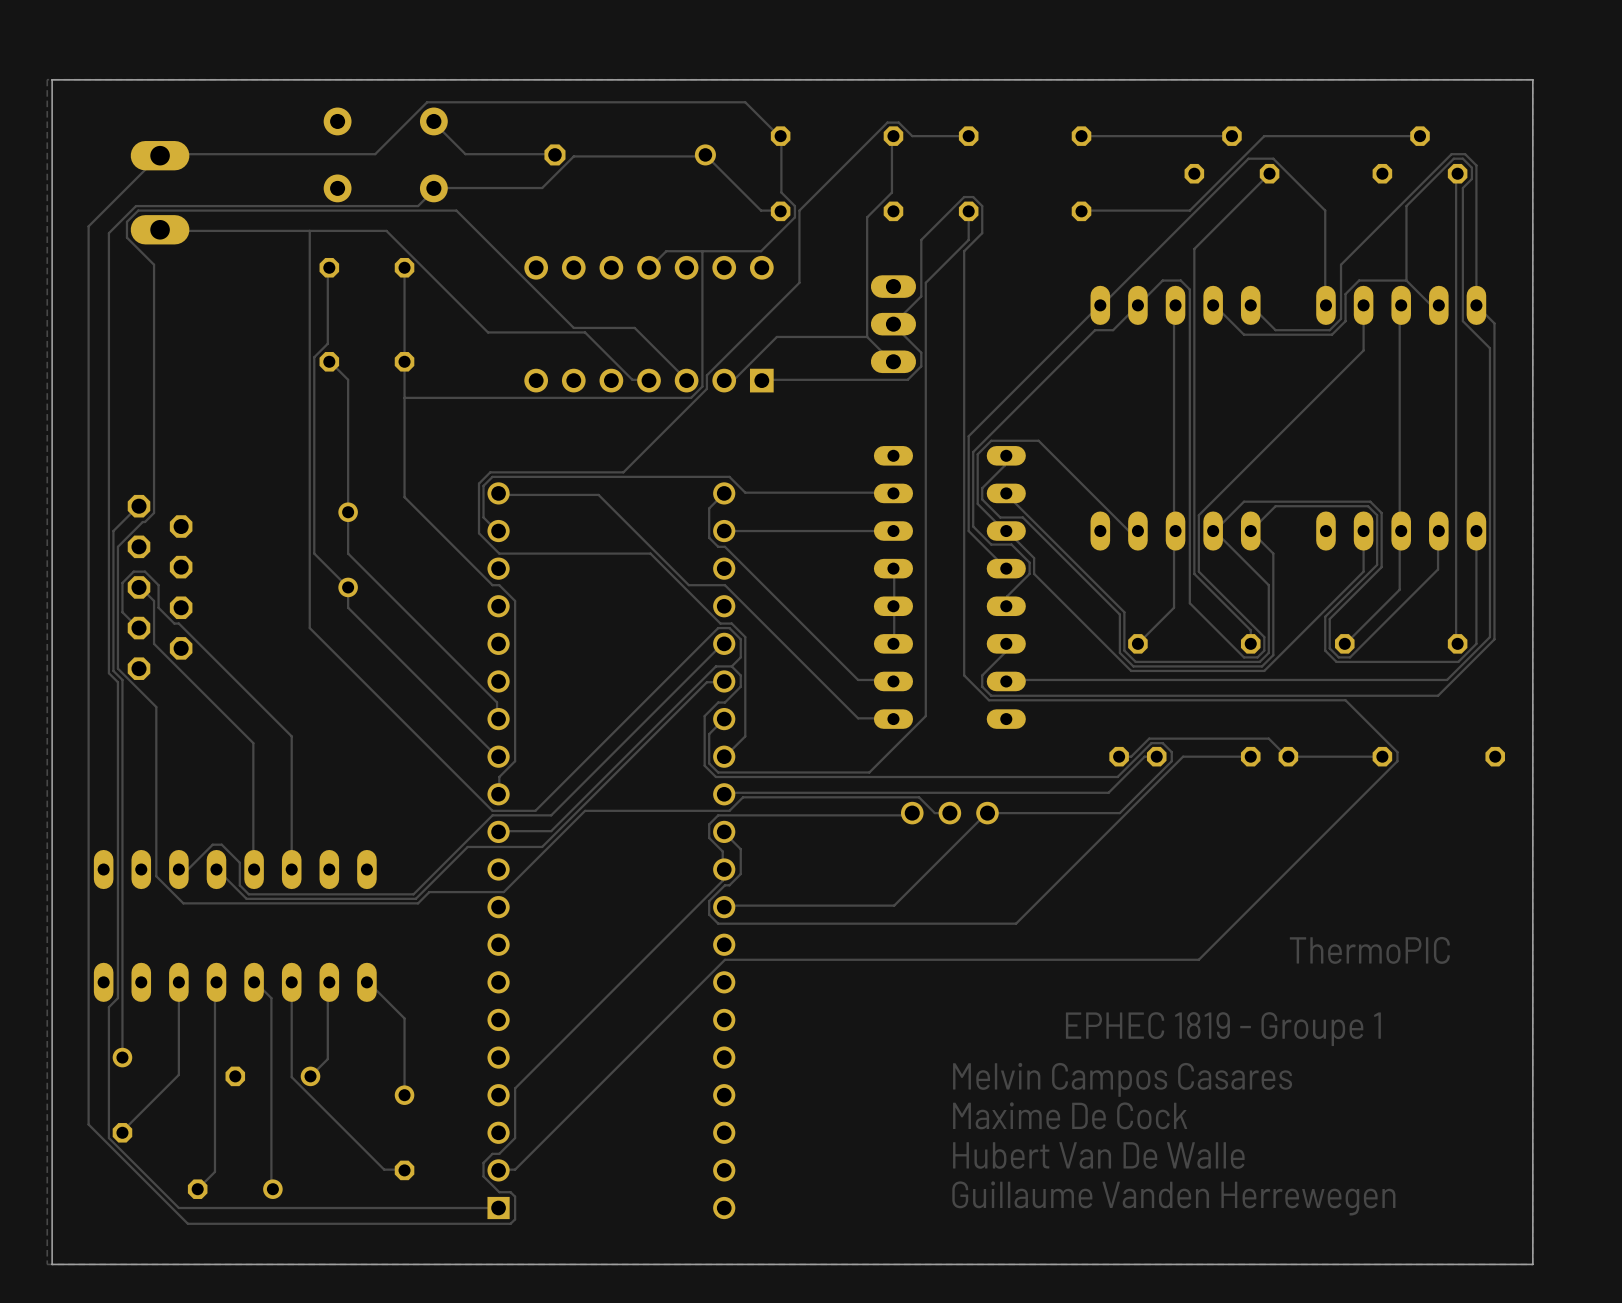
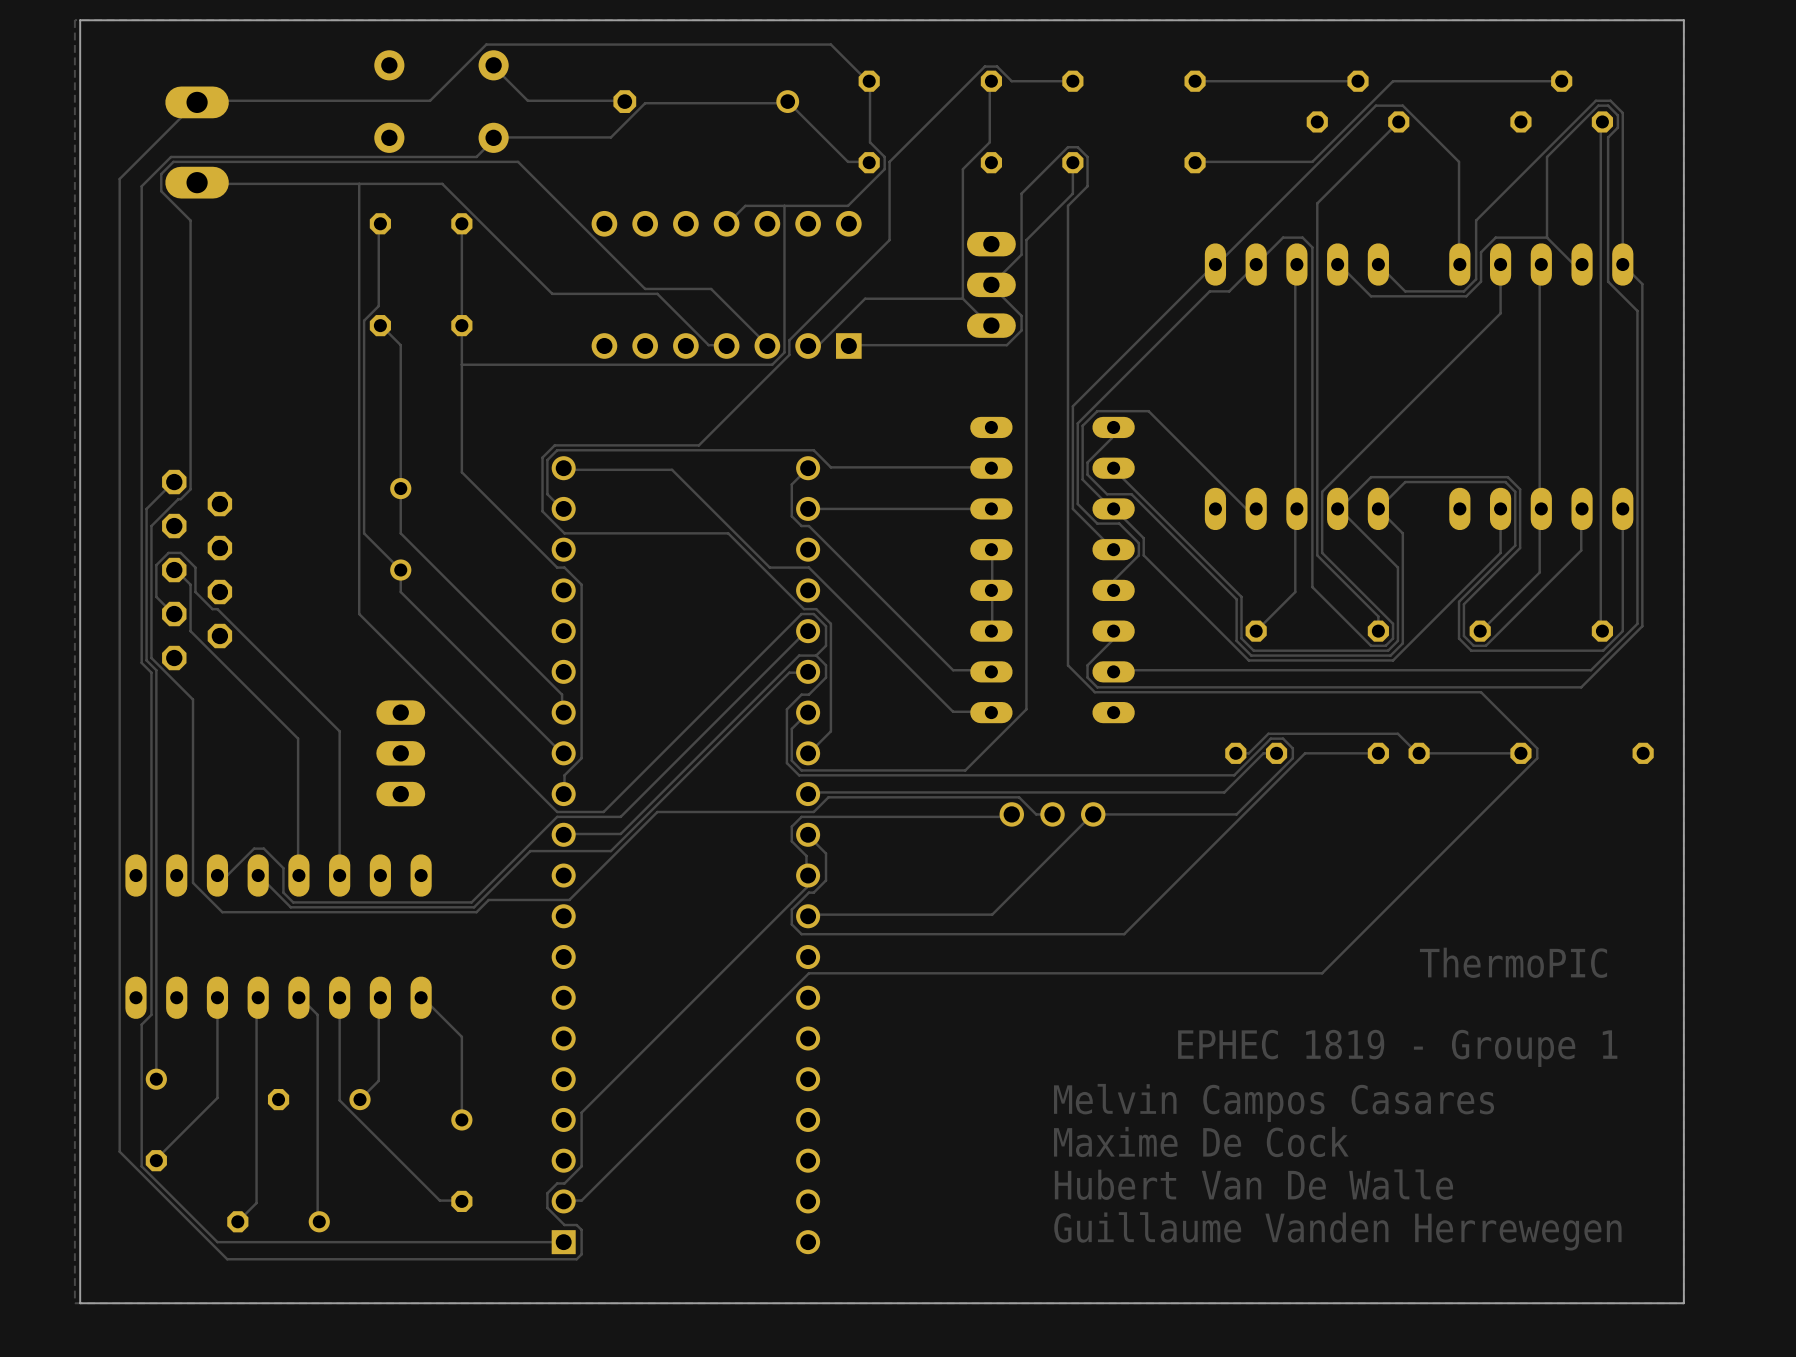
part: none -> (400, 753)

